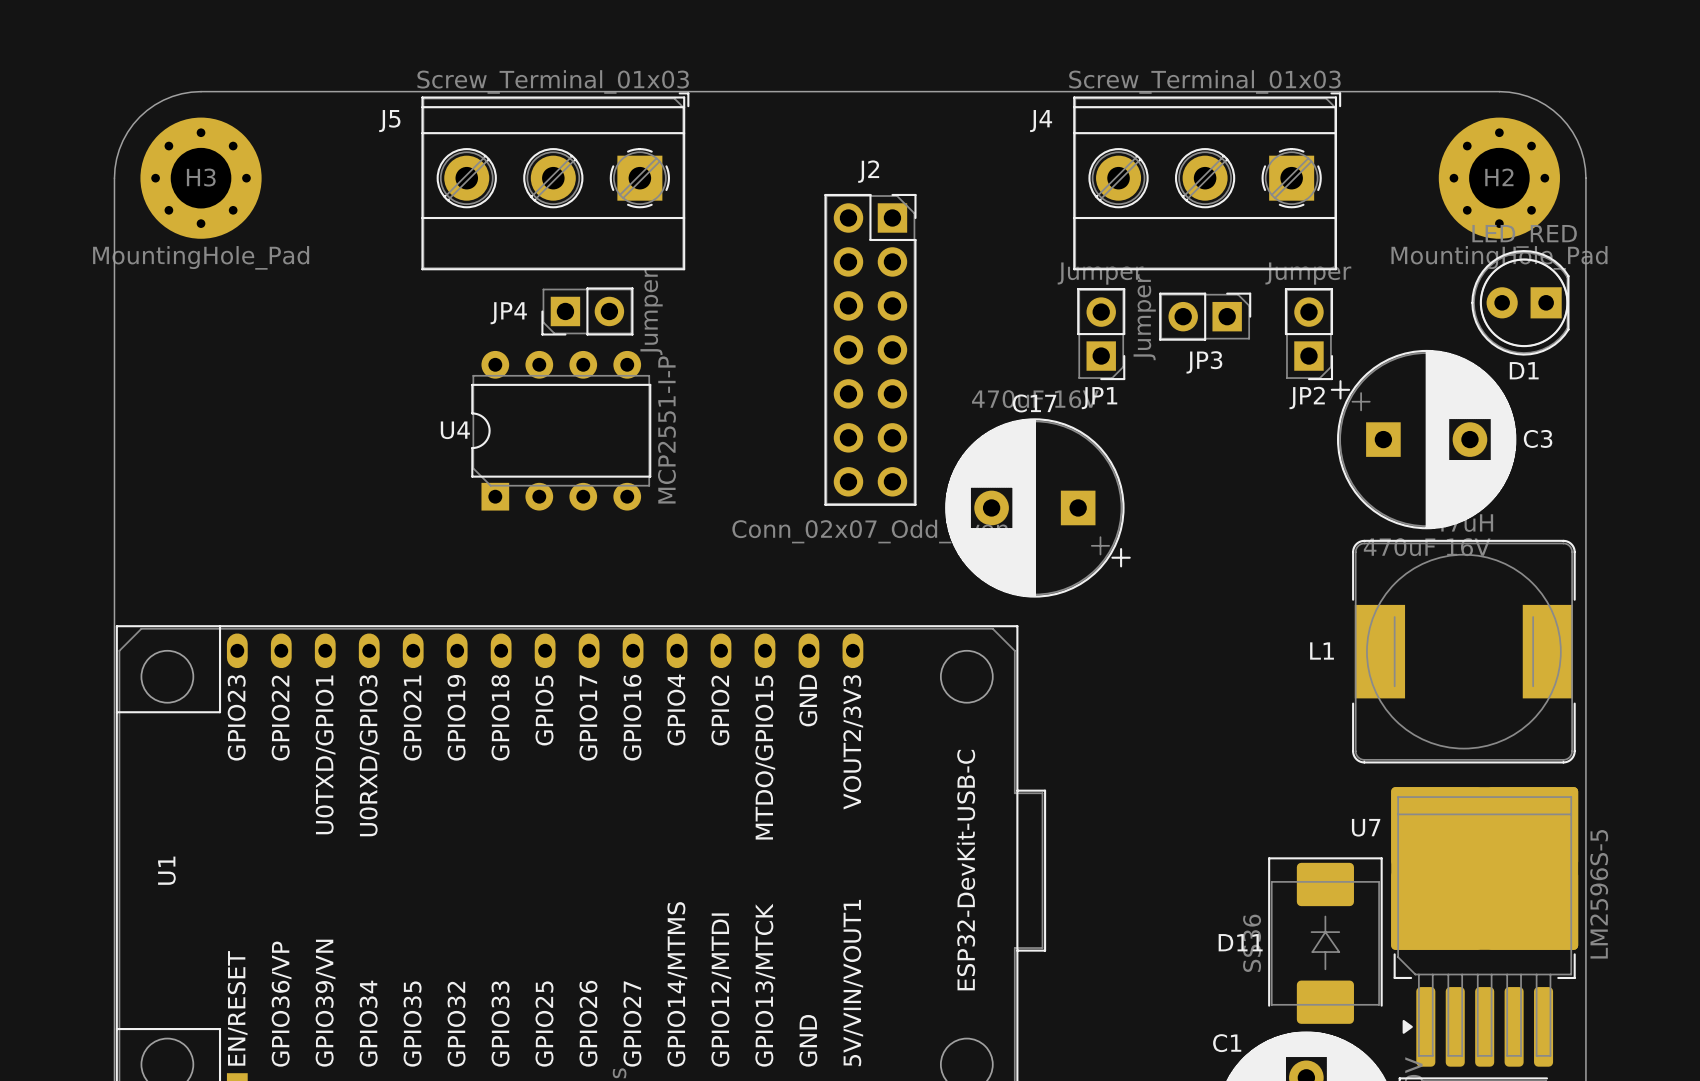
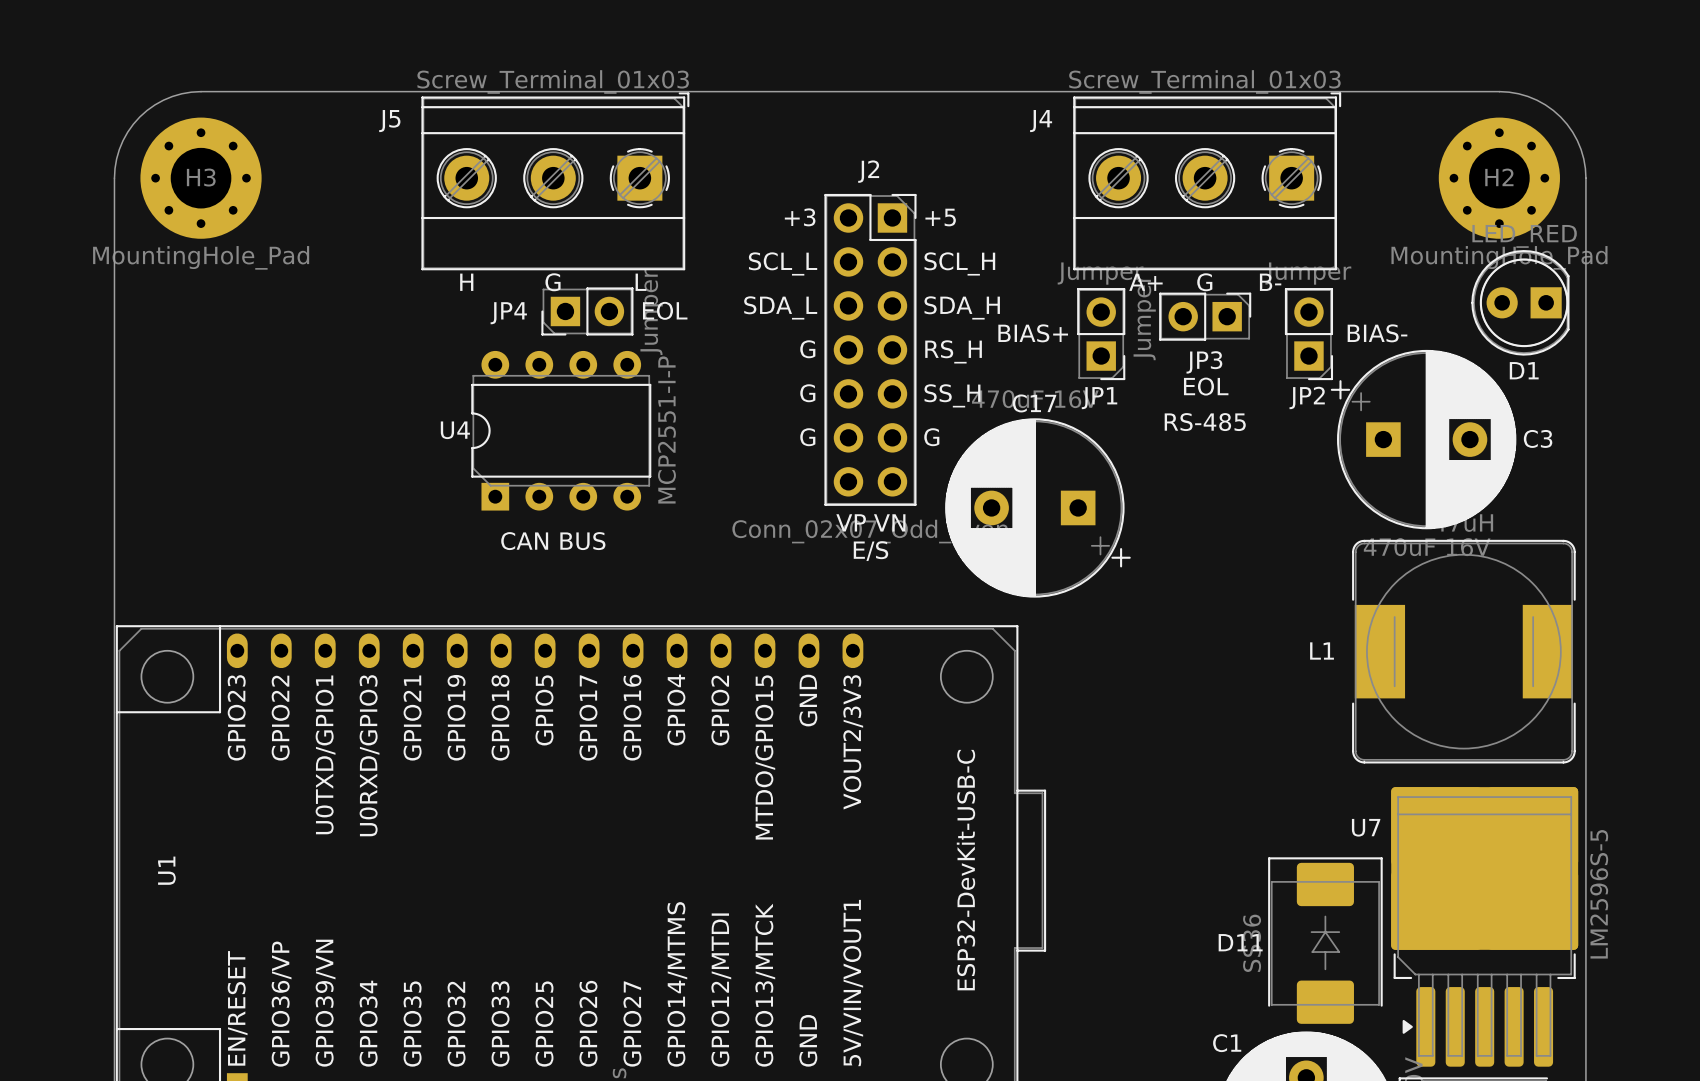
text: none -> +3 (800, 217)
text: none -> +5 (940, 217)
text: none -> SCL_L (783, 263)
text: none -> SCL_H (959, 263)
text: none -> H (466, 282)
text: none -> G (553, 282)
text: none -> L (640, 282)
text: none -> A+ (1145, 282)
text: none -> G (1204, 282)
text: none -> B- (1270, 282)
text: none -> SDA_L (780, 307)
text: none -> SDA_H (962, 307)
text: none -> EOL (665, 310)
text: none -> BIAS+ (1033, 333)
text: none -> BIAS- (1377, 333)
text: none -> G (807, 349)
text: none -> RS_H (953, 351)
text: none -> EOL (1206, 386)
text: none -> G (807, 393)
text: none -> SS_H (952, 395)
text: none -> RS-485 (1205, 422)
text: none -> G (807, 437)
text: none -> G (931, 437)
text: none -> VP (851, 522)
text: none -> VN (889, 522)
text: none -> CAN BUS (553, 541)
text: none -> E/S (870, 551)

